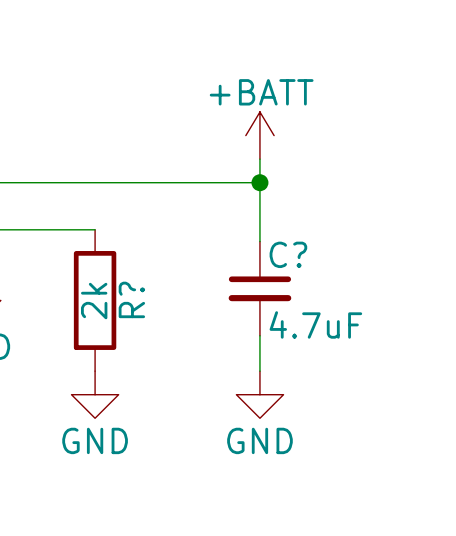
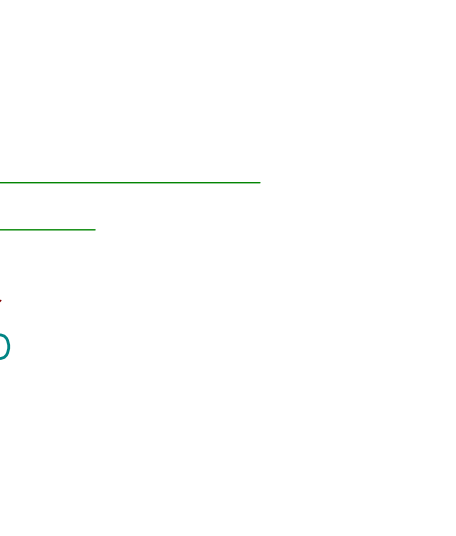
power symbol: +BATT (259, 135) -> none
wire: (259, 159) (259, 241) -> none
junction: (259, 182) -> none
C?: 4.7uF (259, 288) -> none
R?: 2k (95, 300) -> none
wire: (259, 335) (259, 371) -> none
power symbol: GND (95, 394) -> none
power symbol: GND (259, 394) -> none

